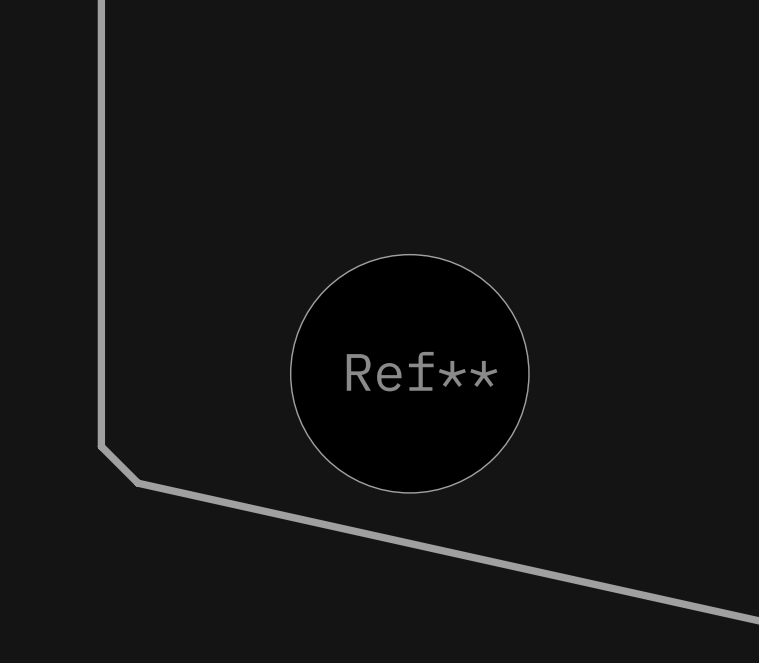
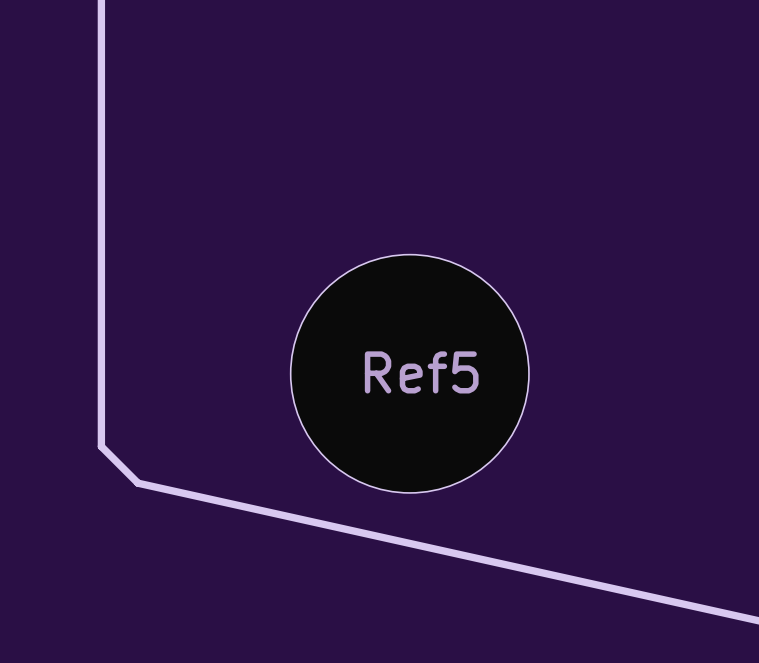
Ref** name: Ref** (422, 371) -> Ref5 (421, 372)

